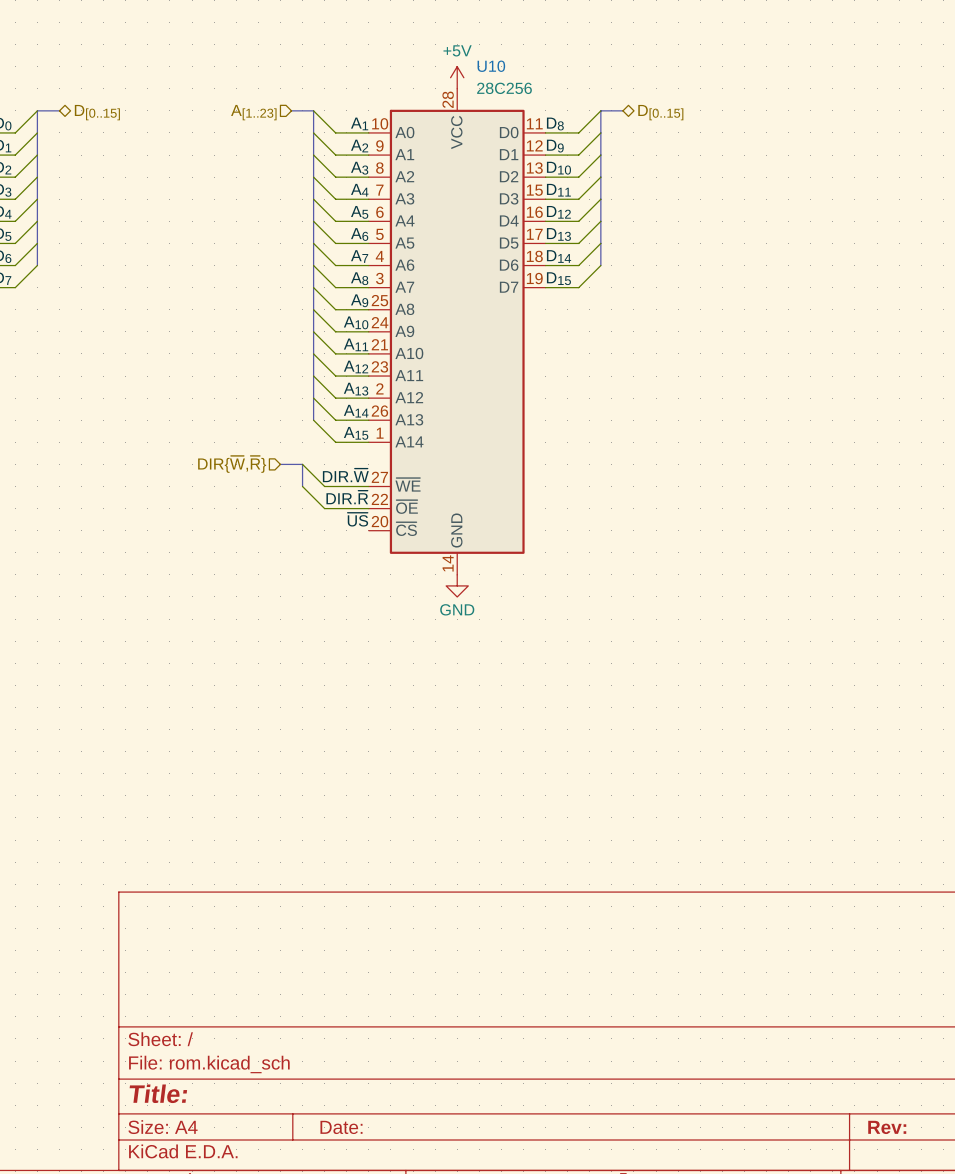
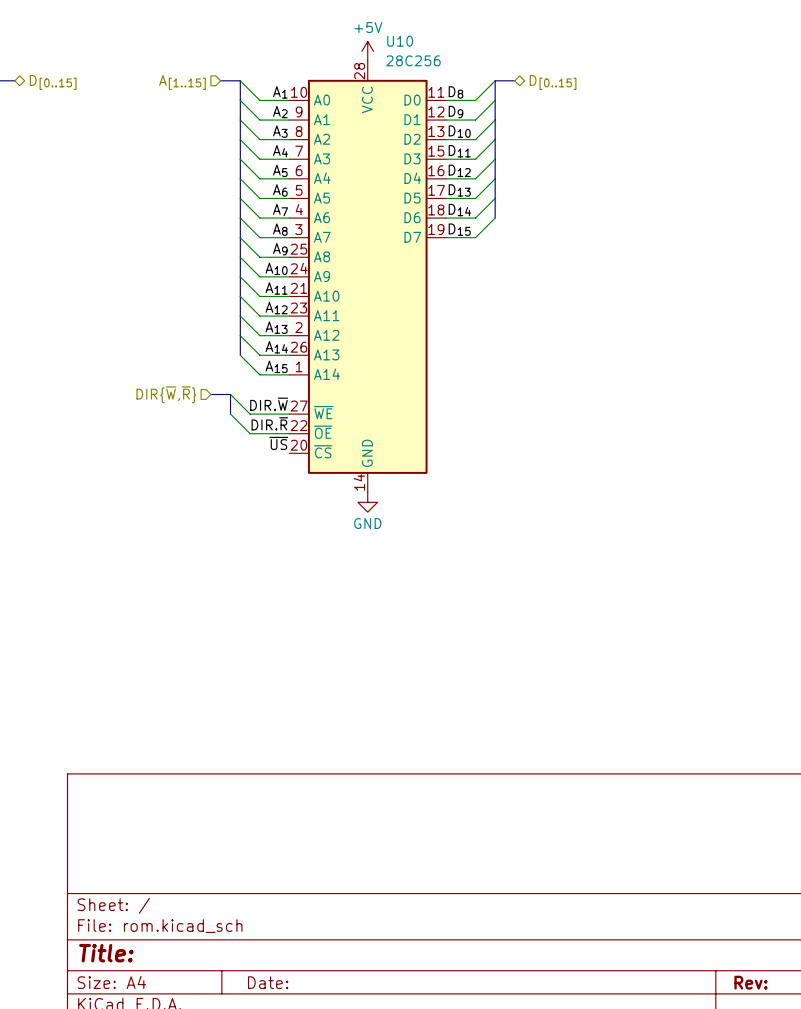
hierarchical label: A[1..23] (253, 112) -> A[1..15] (182, 82)

